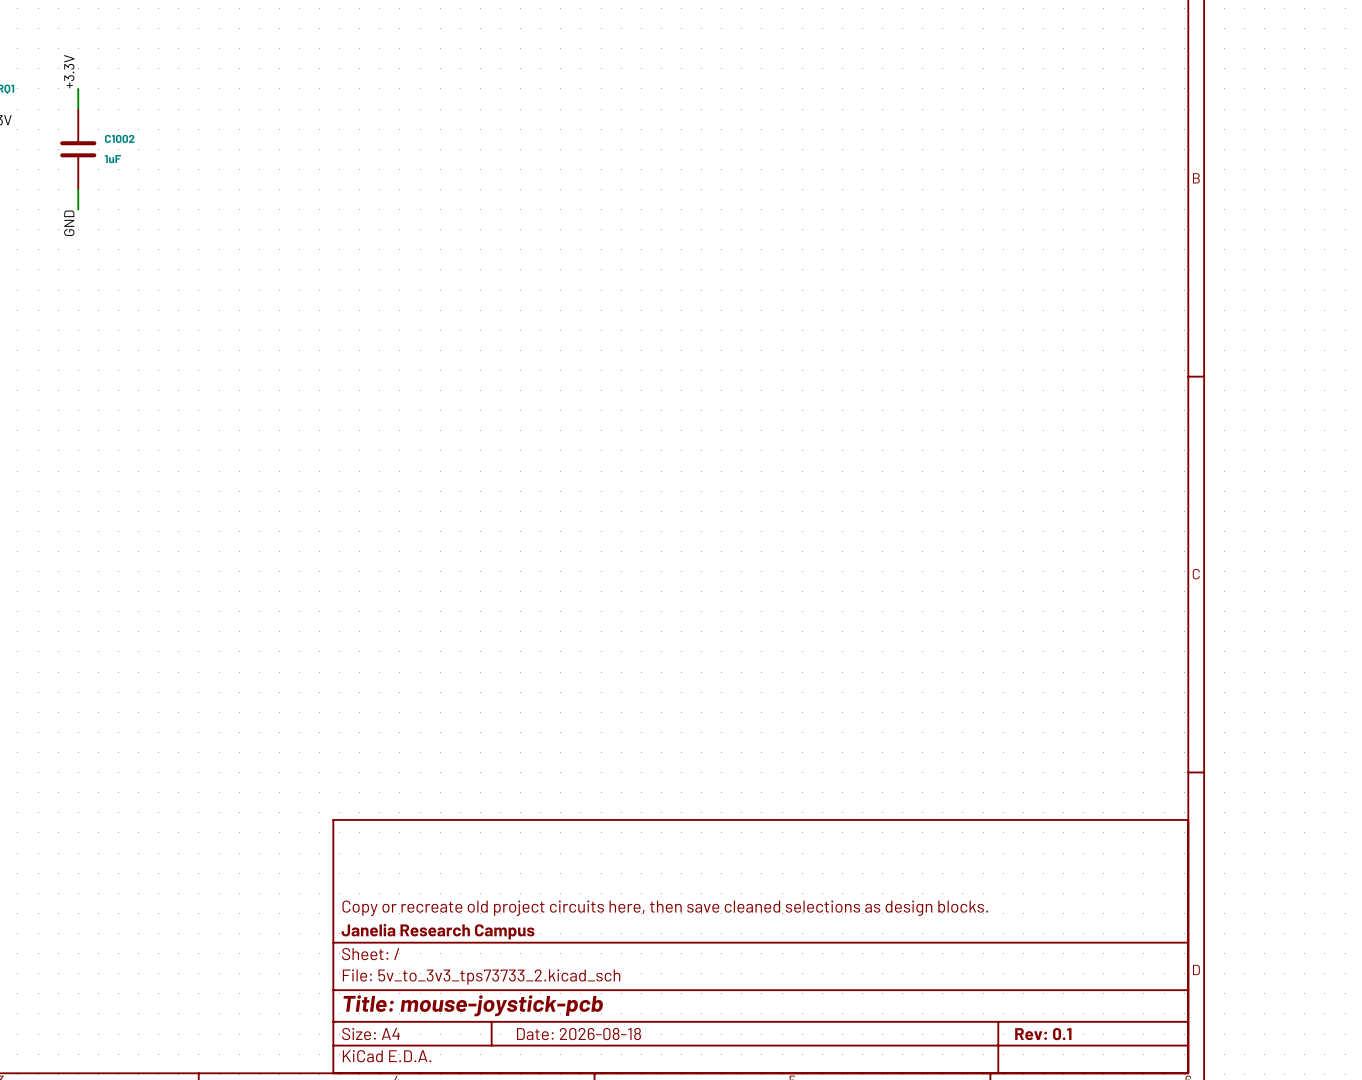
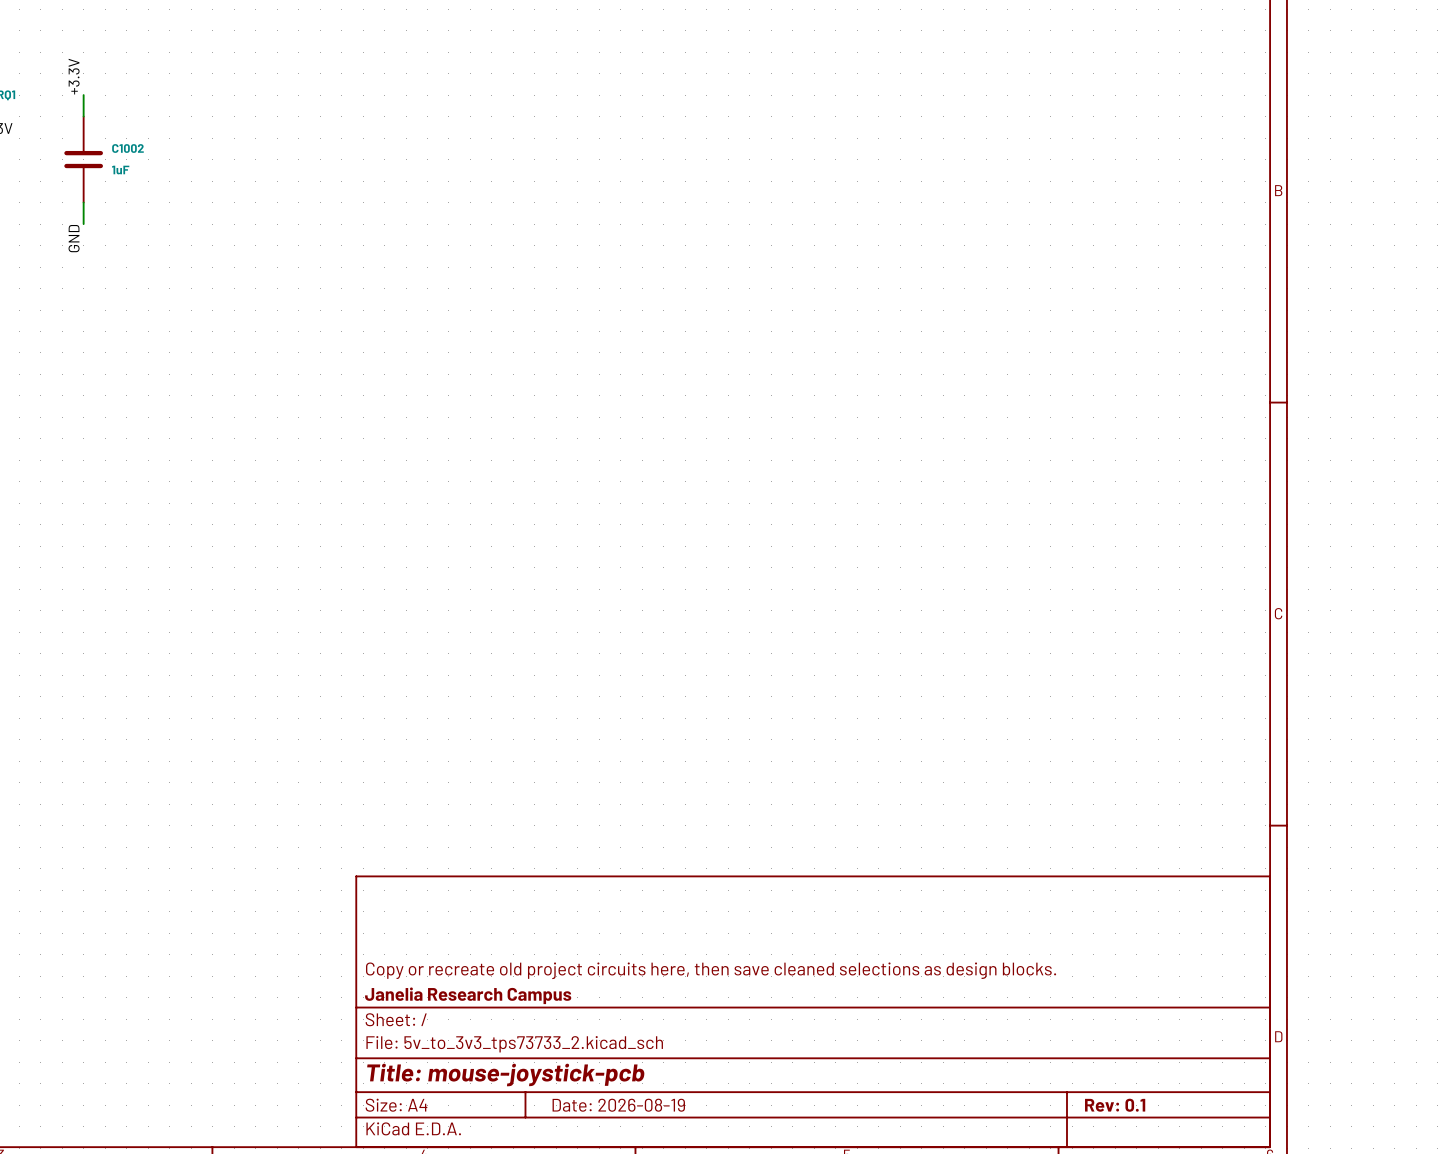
title block: Date: 2026-08-18 (578, 1034) -> Date: 2026-08-19 (618, 1105)

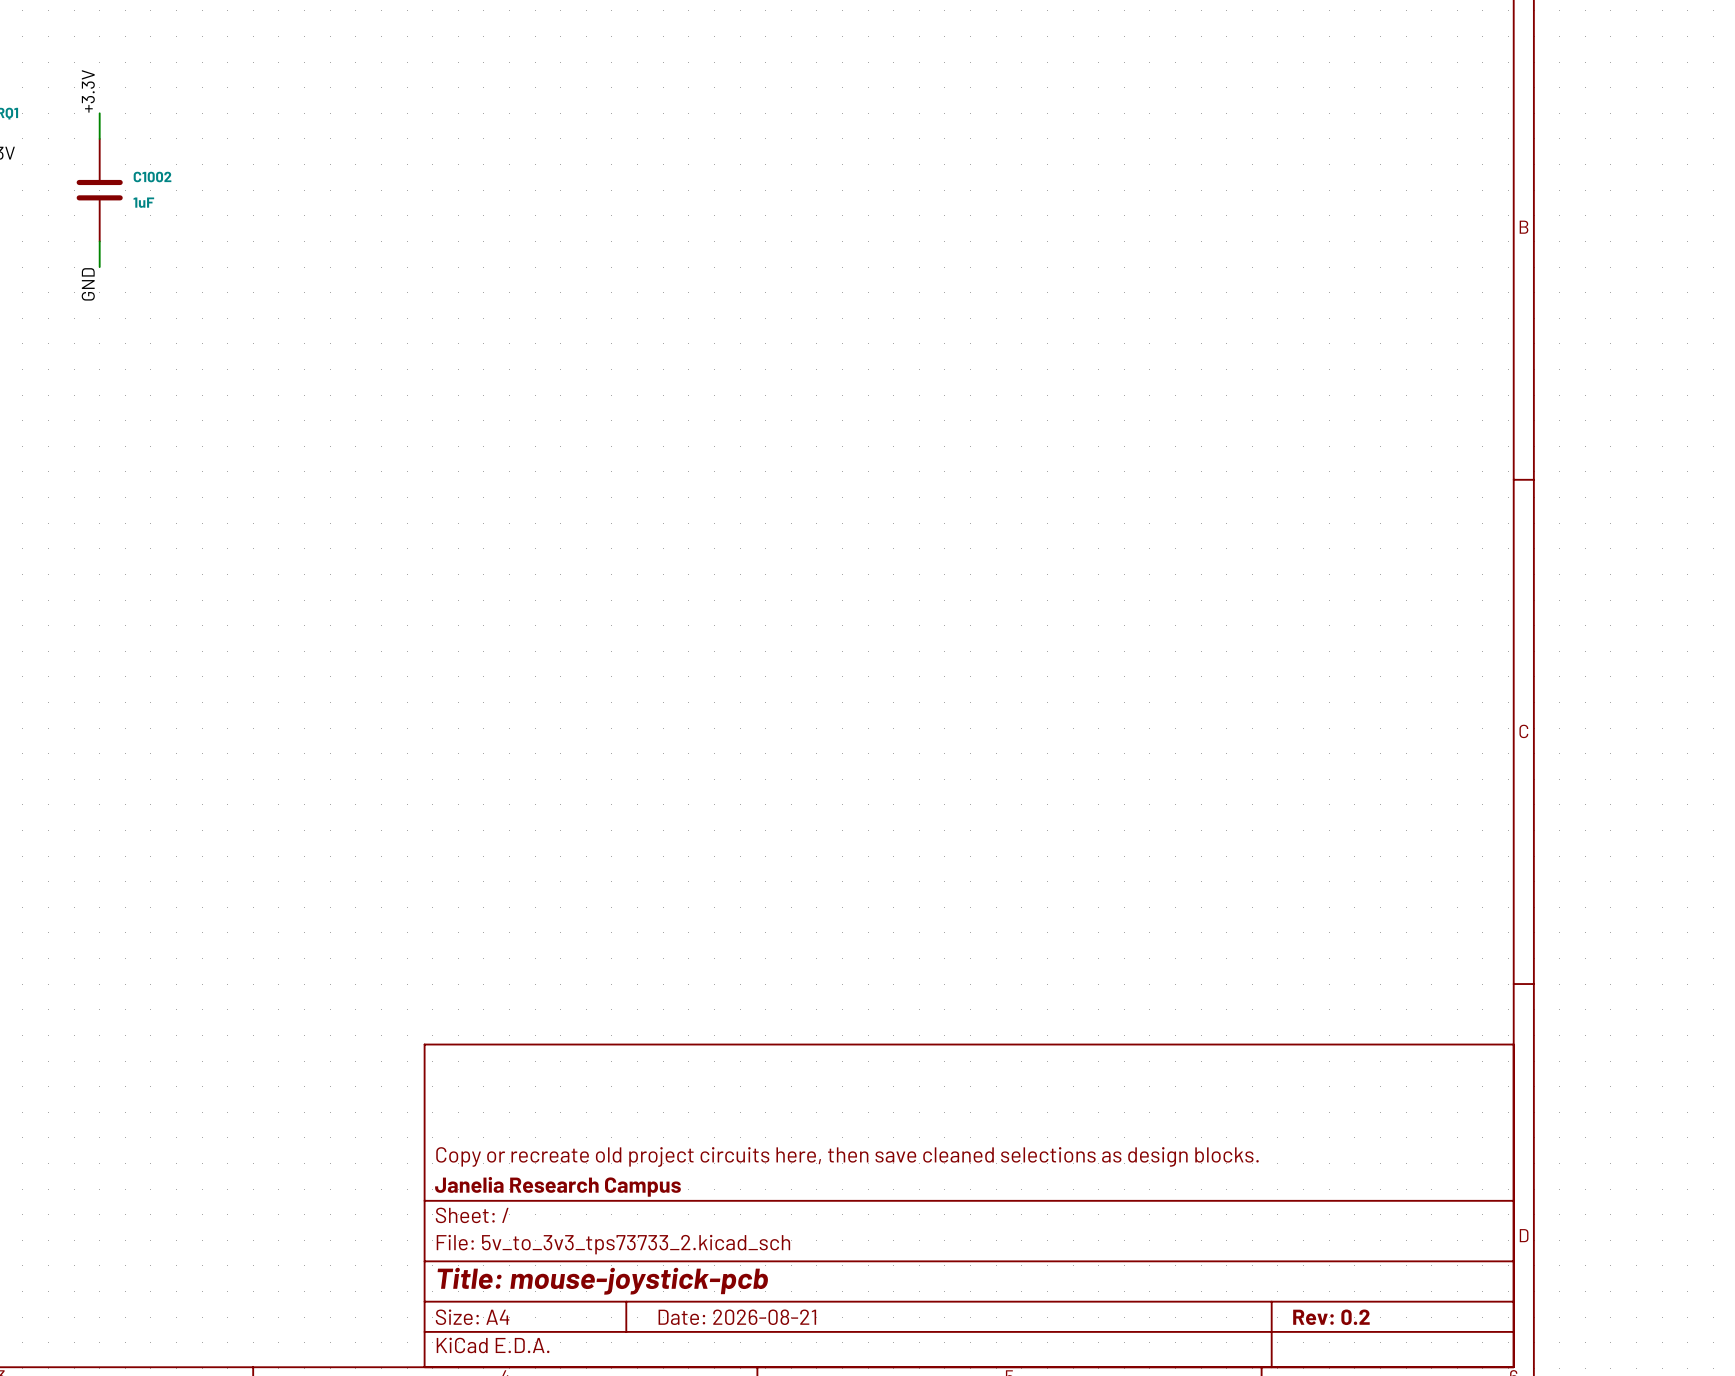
title block: Date: 2026-08-19 (618, 1105) -> Date: 2026-08-21 (737, 1317)
title block: Rev: 0.1 (1115, 1105) -> Rev: 0.2 (1331, 1317)

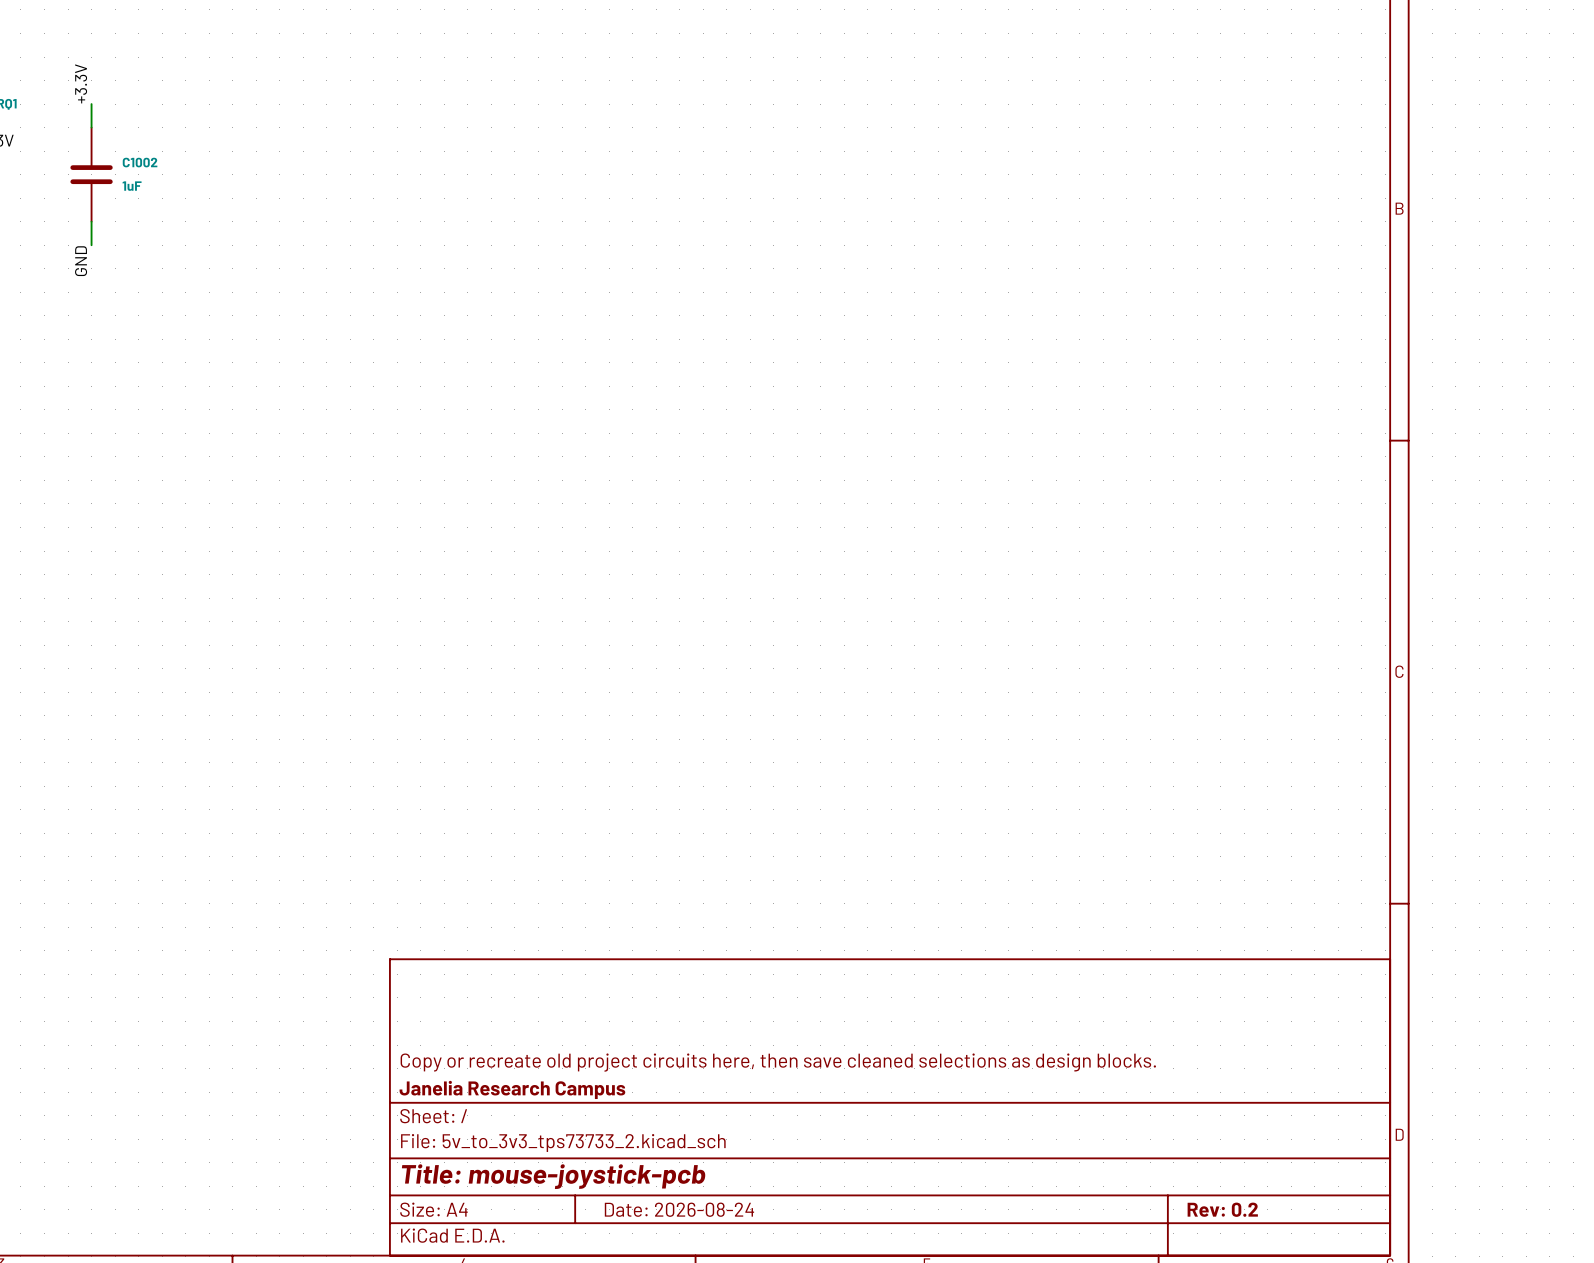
title block: Date: 2026-08-21 (737, 1317) -> Date: 2026-08-24 (679, 1209)

